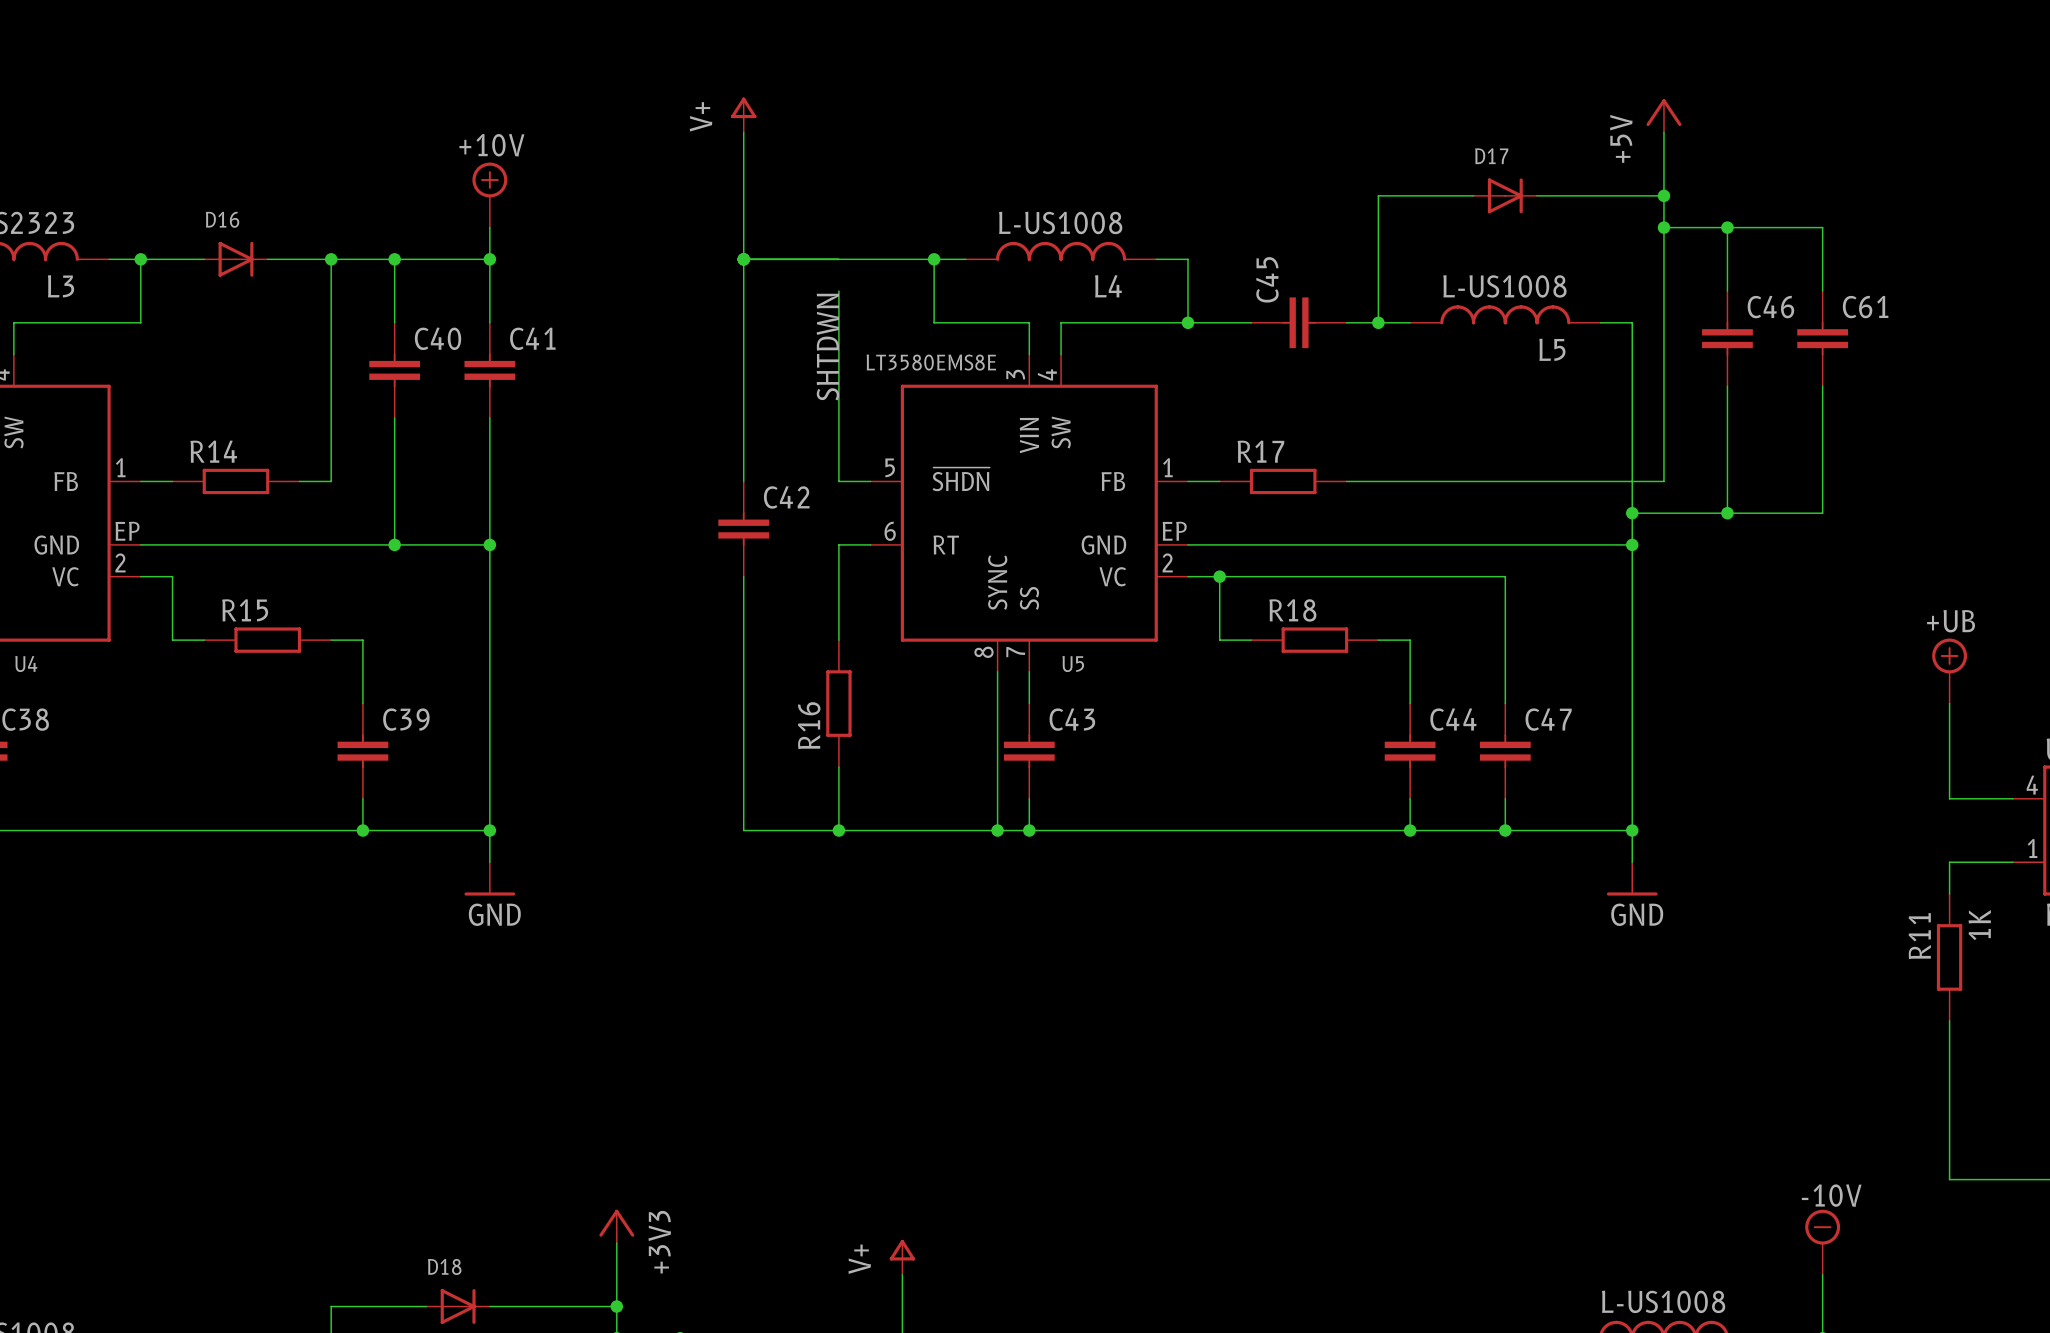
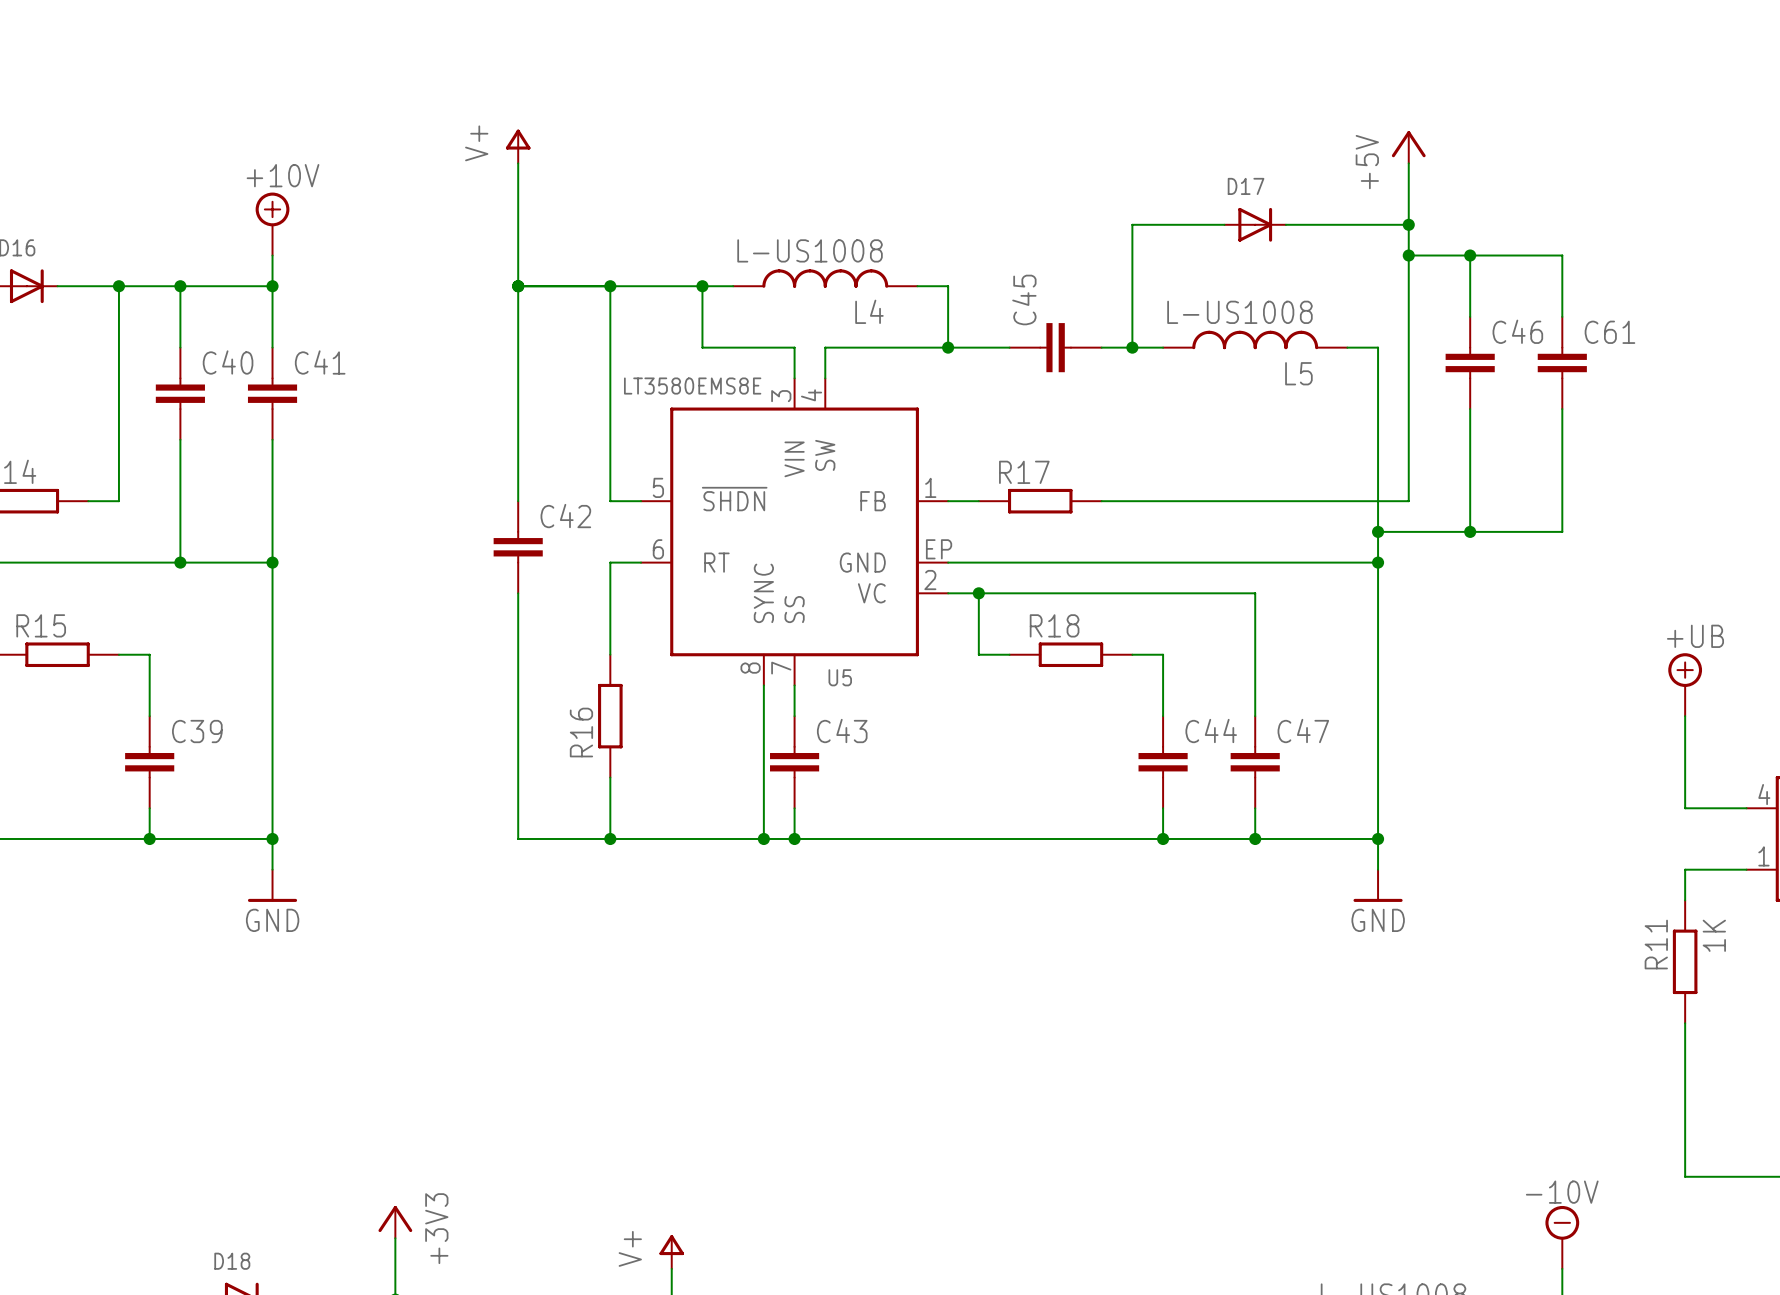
wire: none -> (610, 286) (610, 316)
junction: none -> (610, 286)
label: SHTDWN (827, 347) -> none

